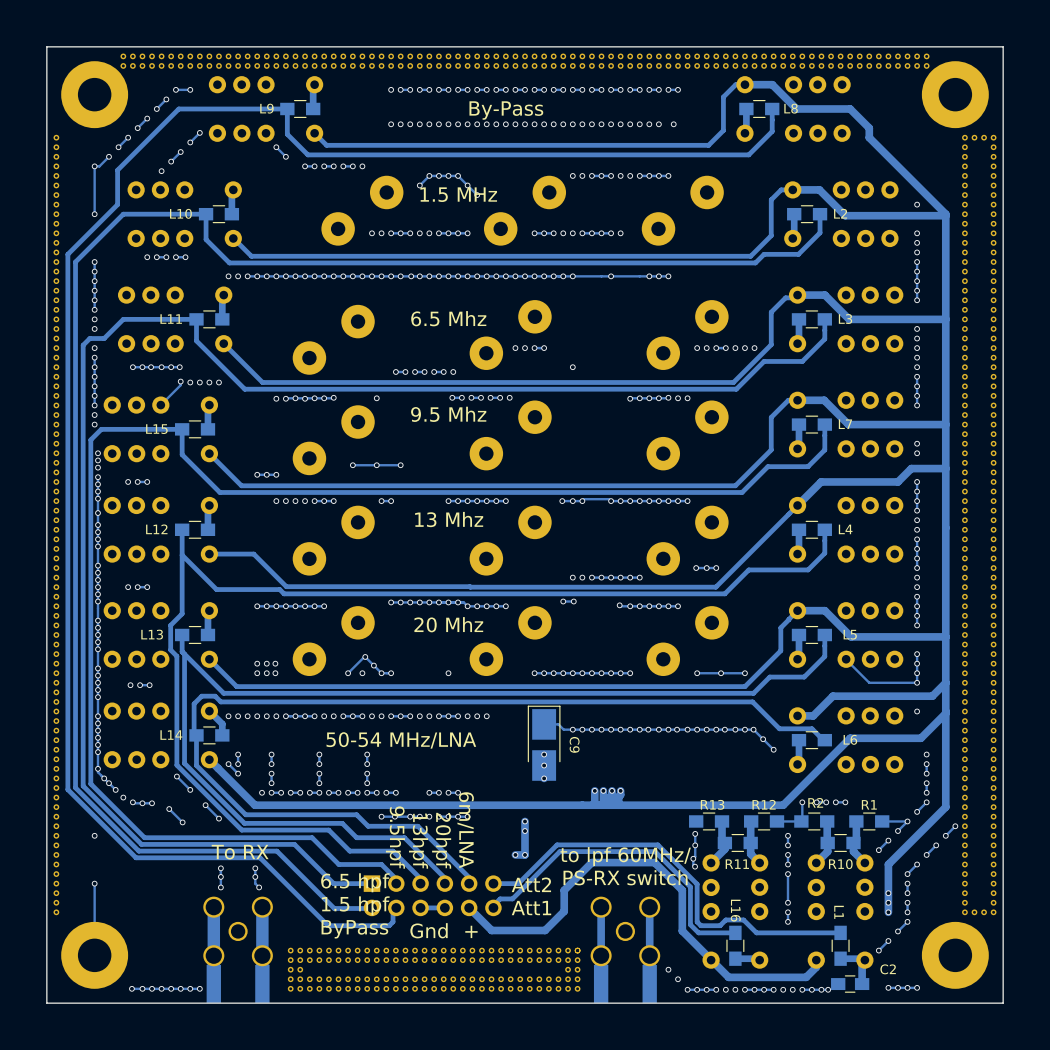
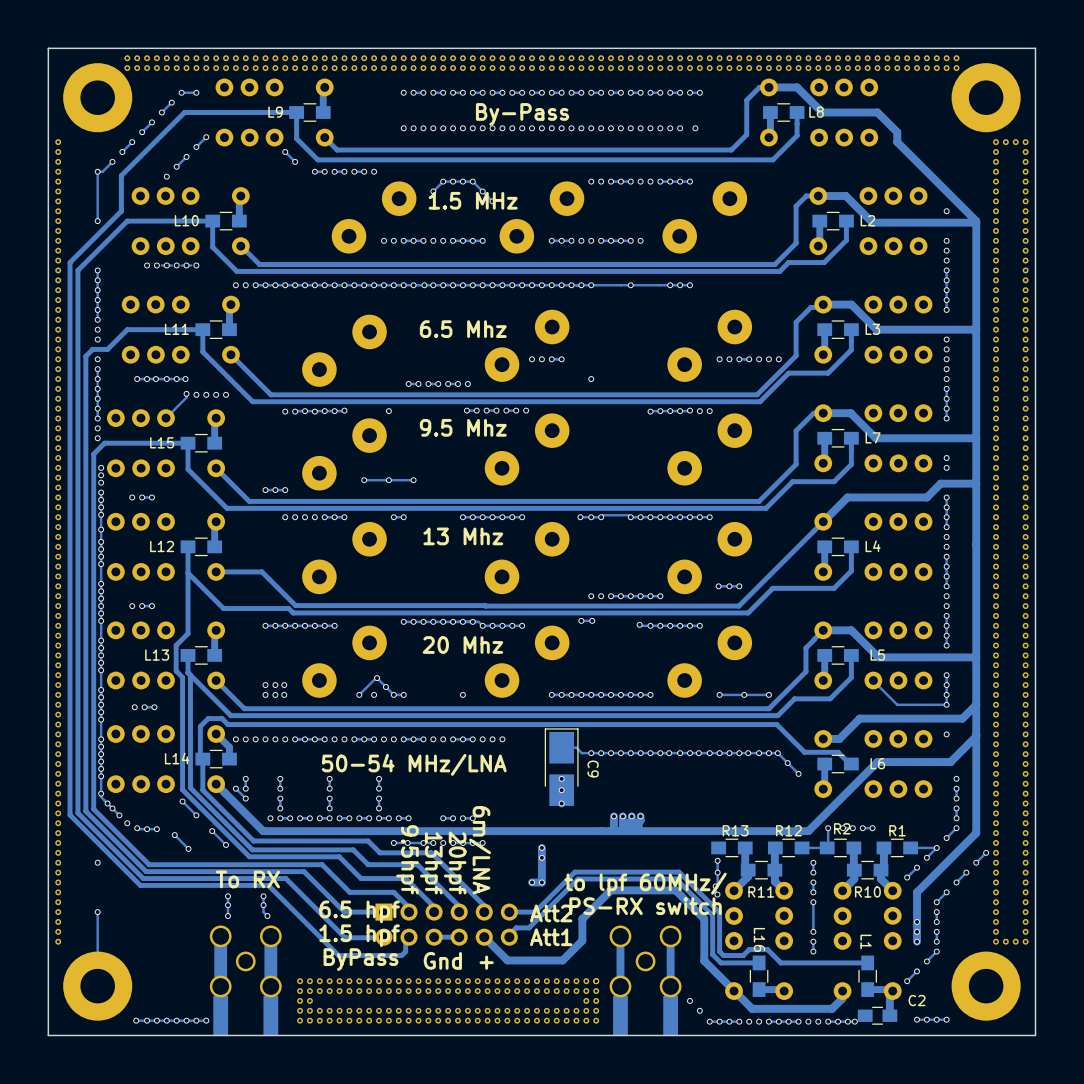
via: none -> (147, 265)
via: (147, 257) -> none
via: none -> (156, 265)
via: (156, 257) -> none
via: none -> (166, 265)
via: (166, 257) -> none
via: none -> (176, 265)
via: (175, 257) -> none
via: none -> (186, 265)
via: (185, 257) -> none
via: none -> (196, 265)

